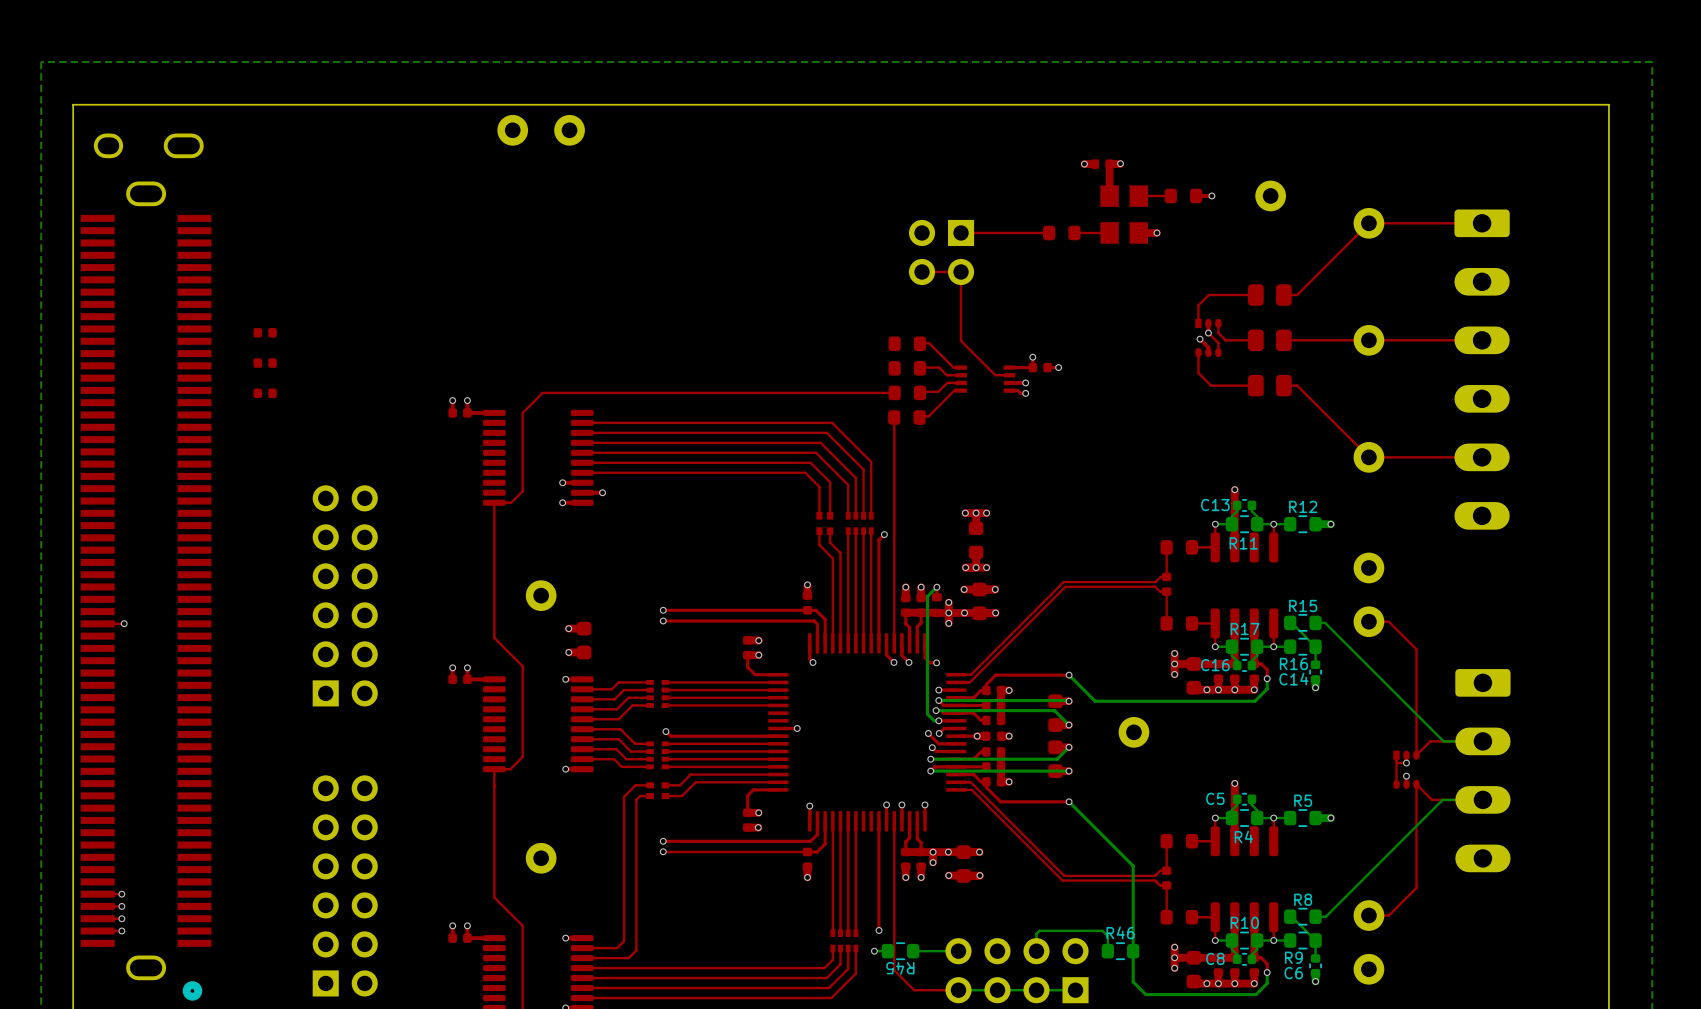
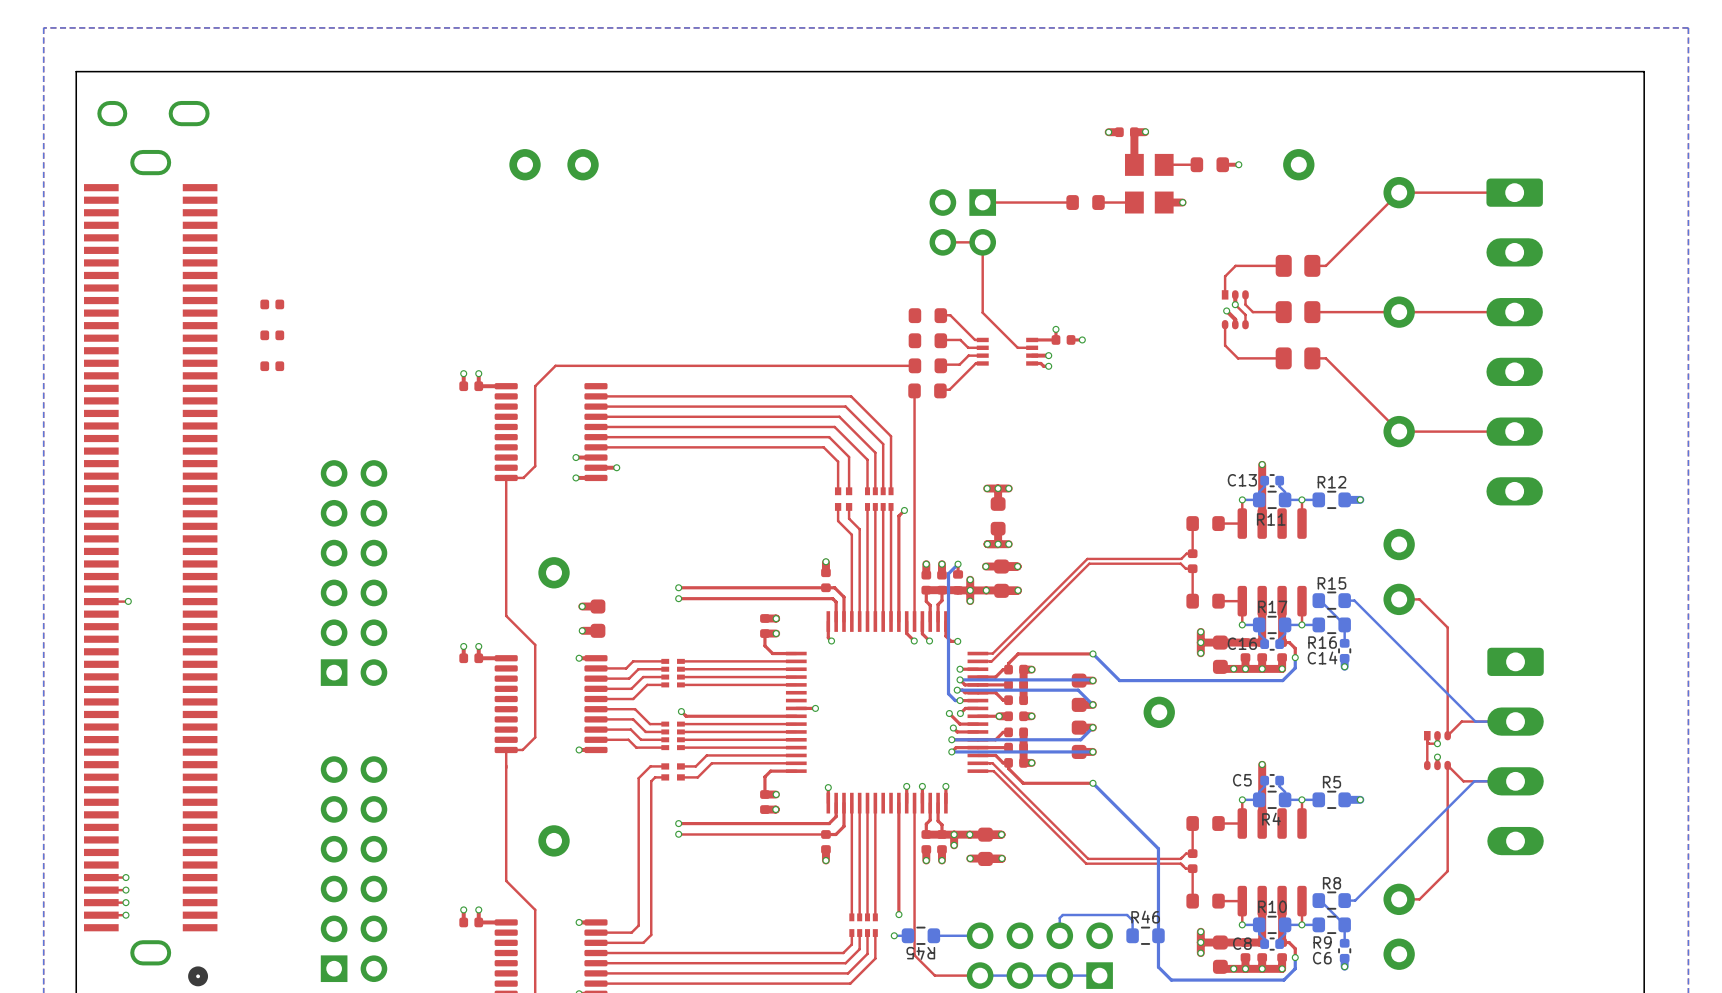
part: (512, 130) -> none
part: (569, 130) -> none
part: none -> (525, 164)
part: none -> (583, 164)

